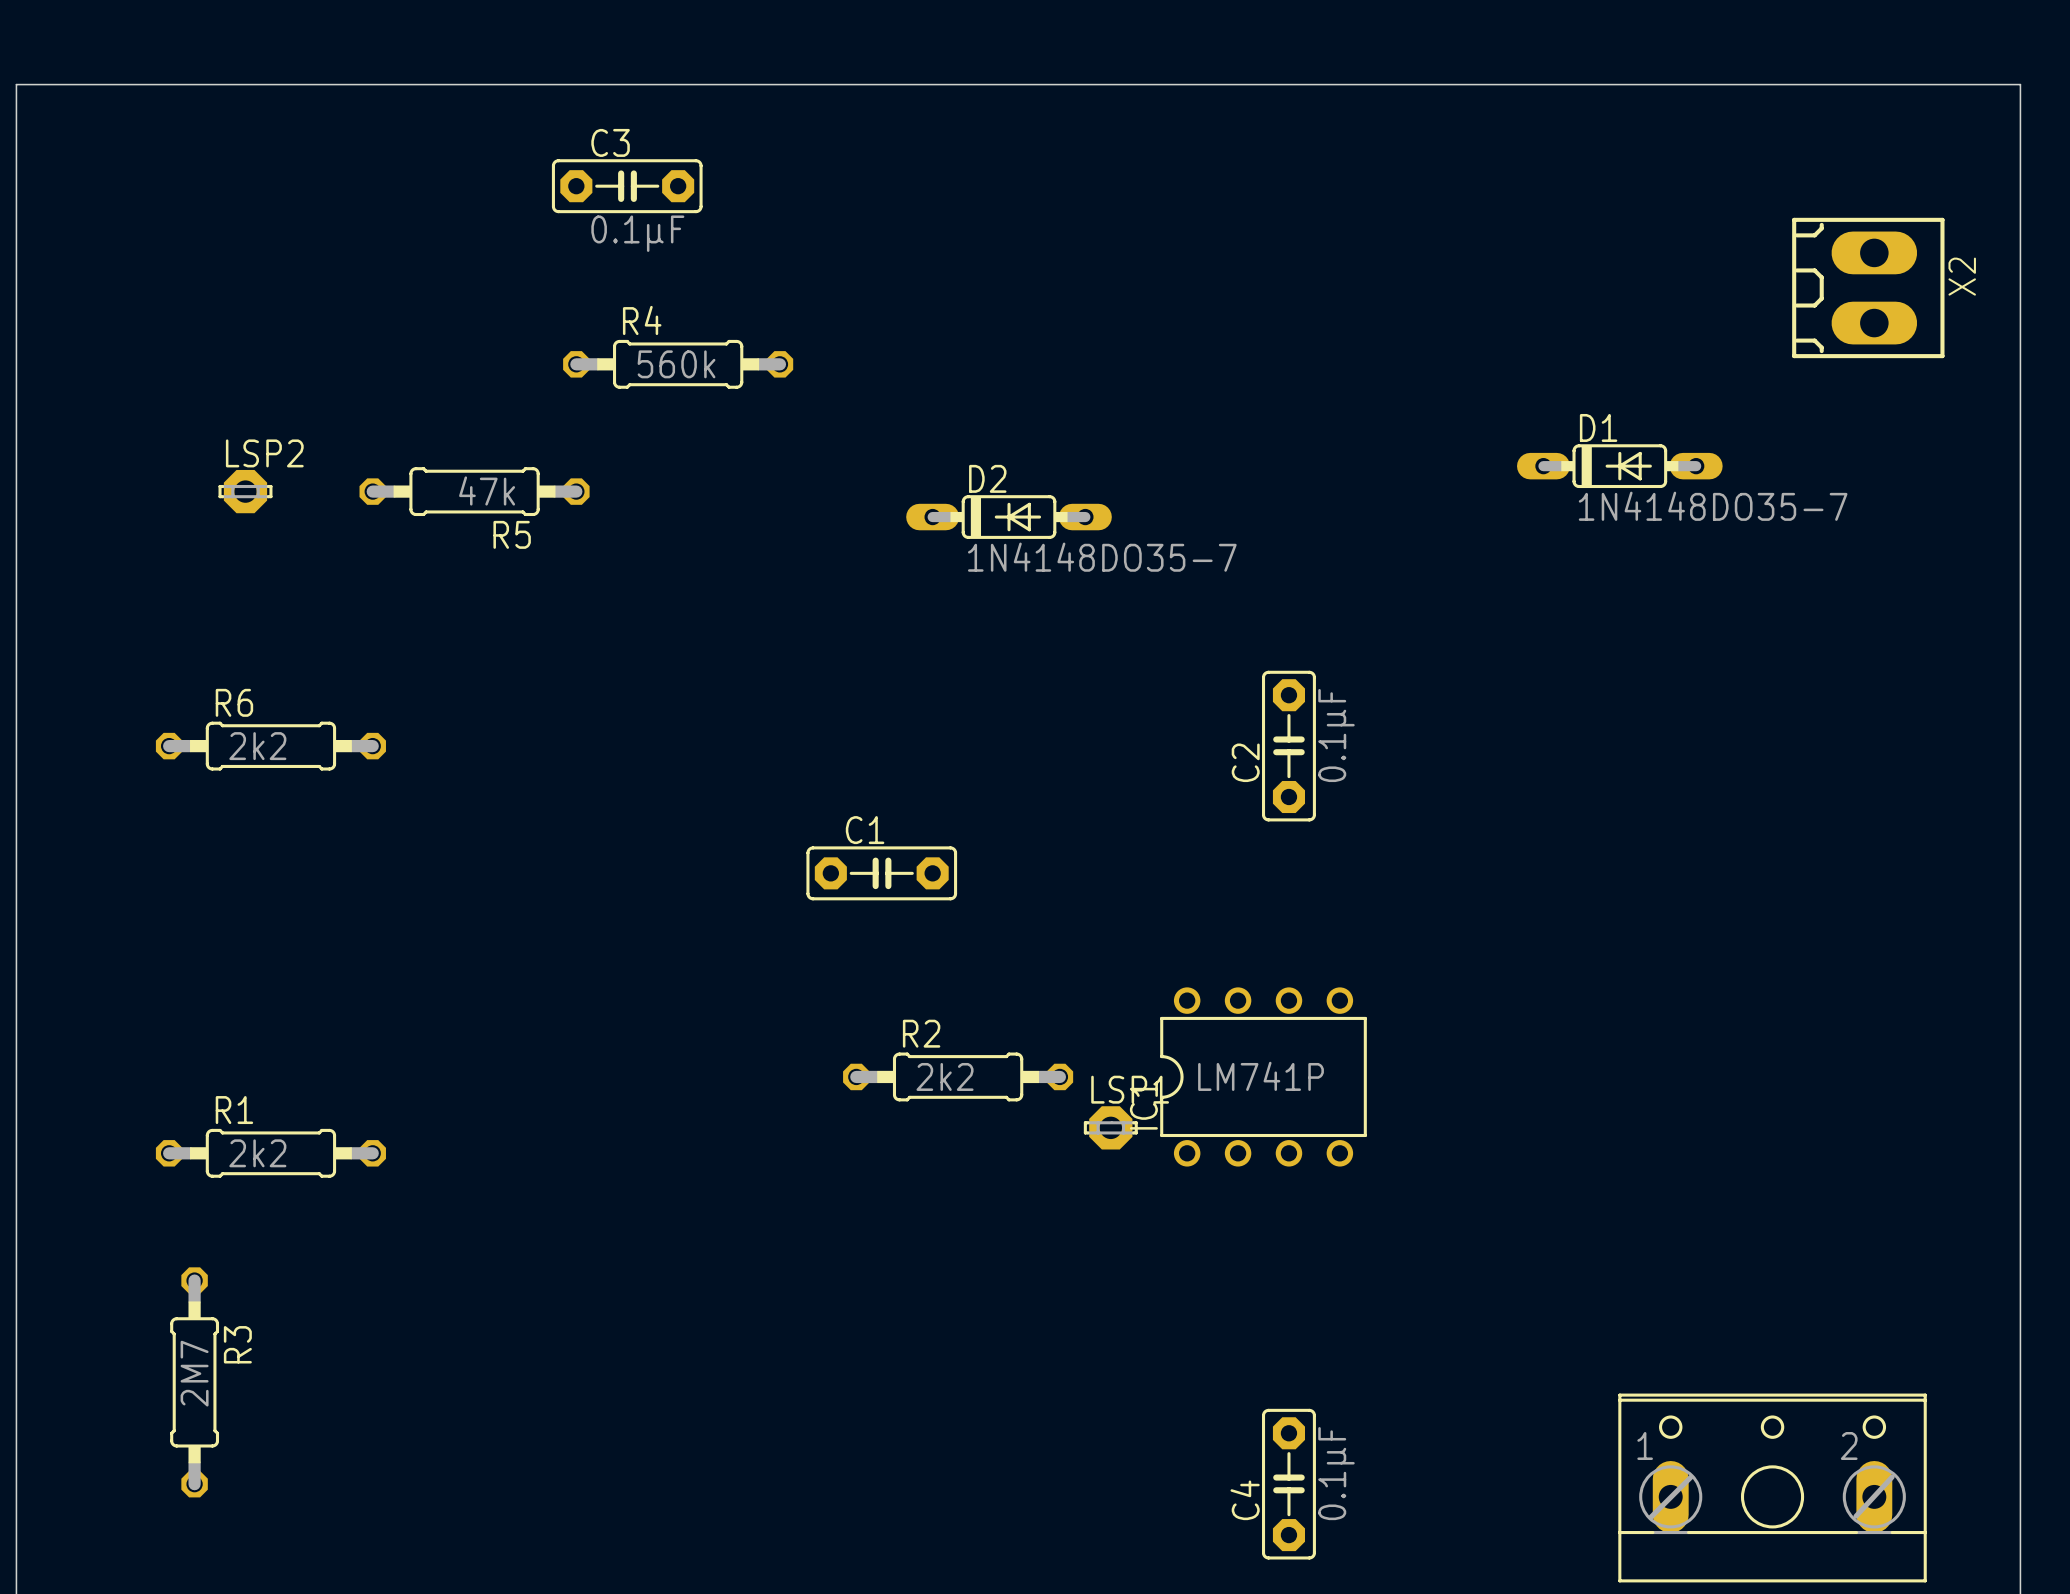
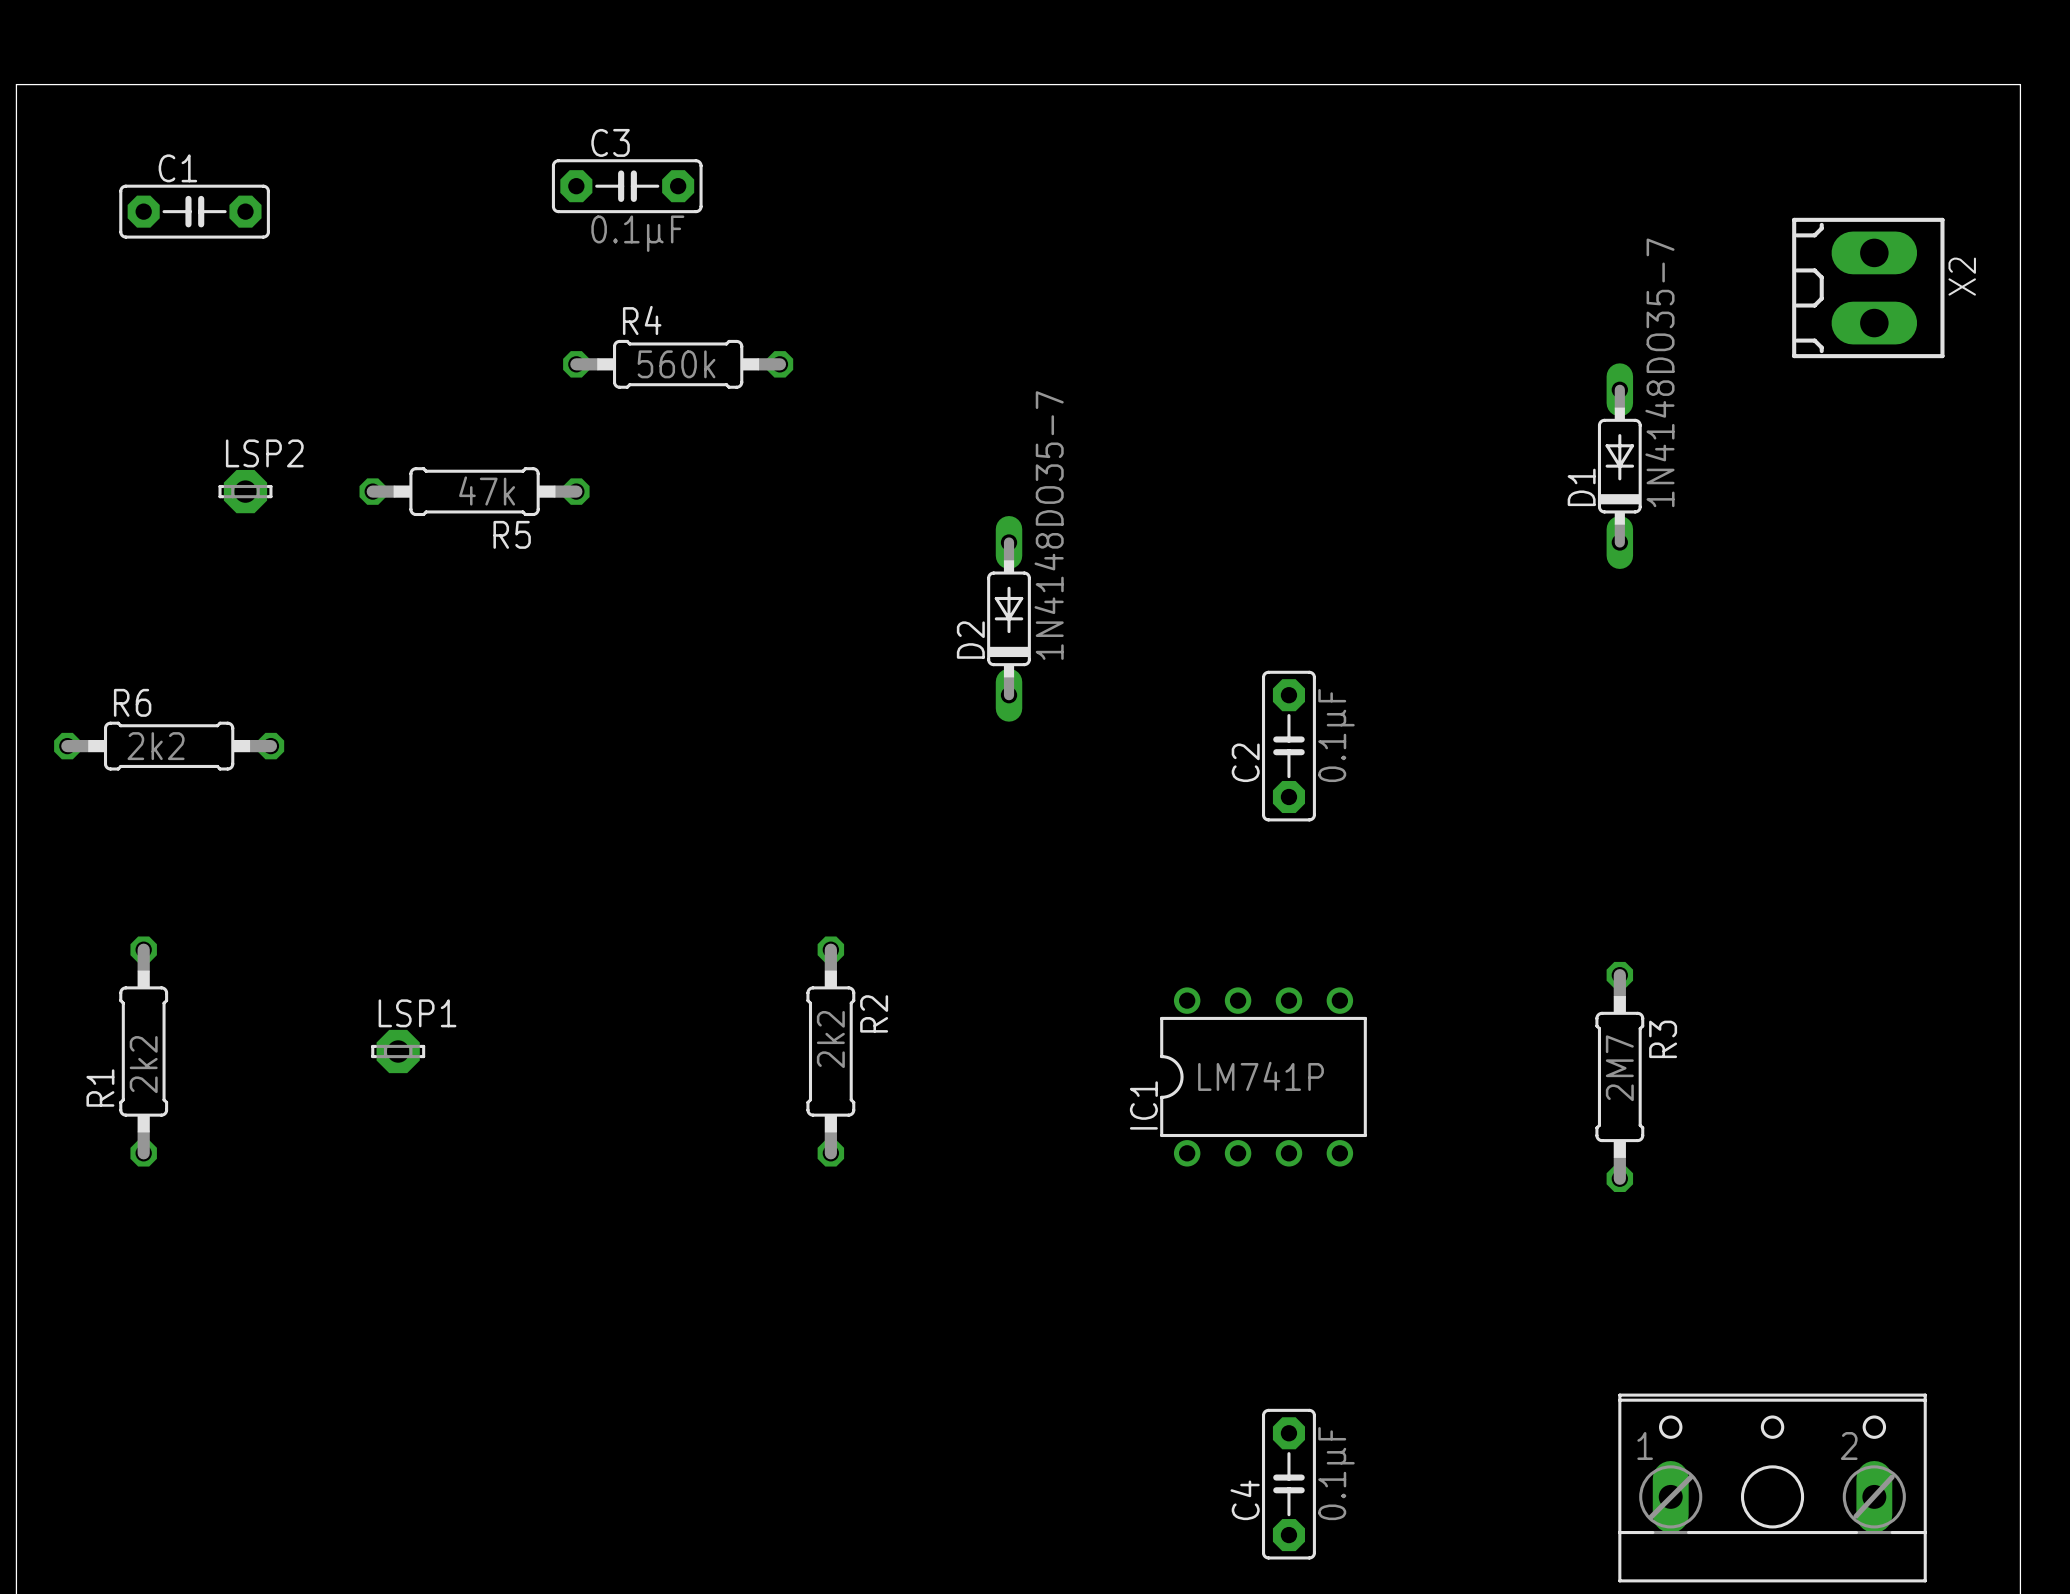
D1 rotation: 0° (1619, 466) -> 90° counterclockwise (1619, 466)
D2 rotation: 0° (1009, 517) -> 90° counterclockwise (1009, 618)
R6 position: (270, 746) -> (169, 746)
C1 position: (881, 873) -> (194, 211)
R2 rotation: 0° (958, 1076) -> 90° clockwise (830, 1051)
R1 name position: R1 (234, 1110) -> R1 (100, 1088)
LSP1 position: (1110, 1127) -> (398, 1051)
R1 rotation: 0° (270, 1153) -> 90° clockwise (143, 1051)
R1 position: (270, 1153) -> (143, 1051)
R3 position: (194, 1382) -> (1619, 1076)

